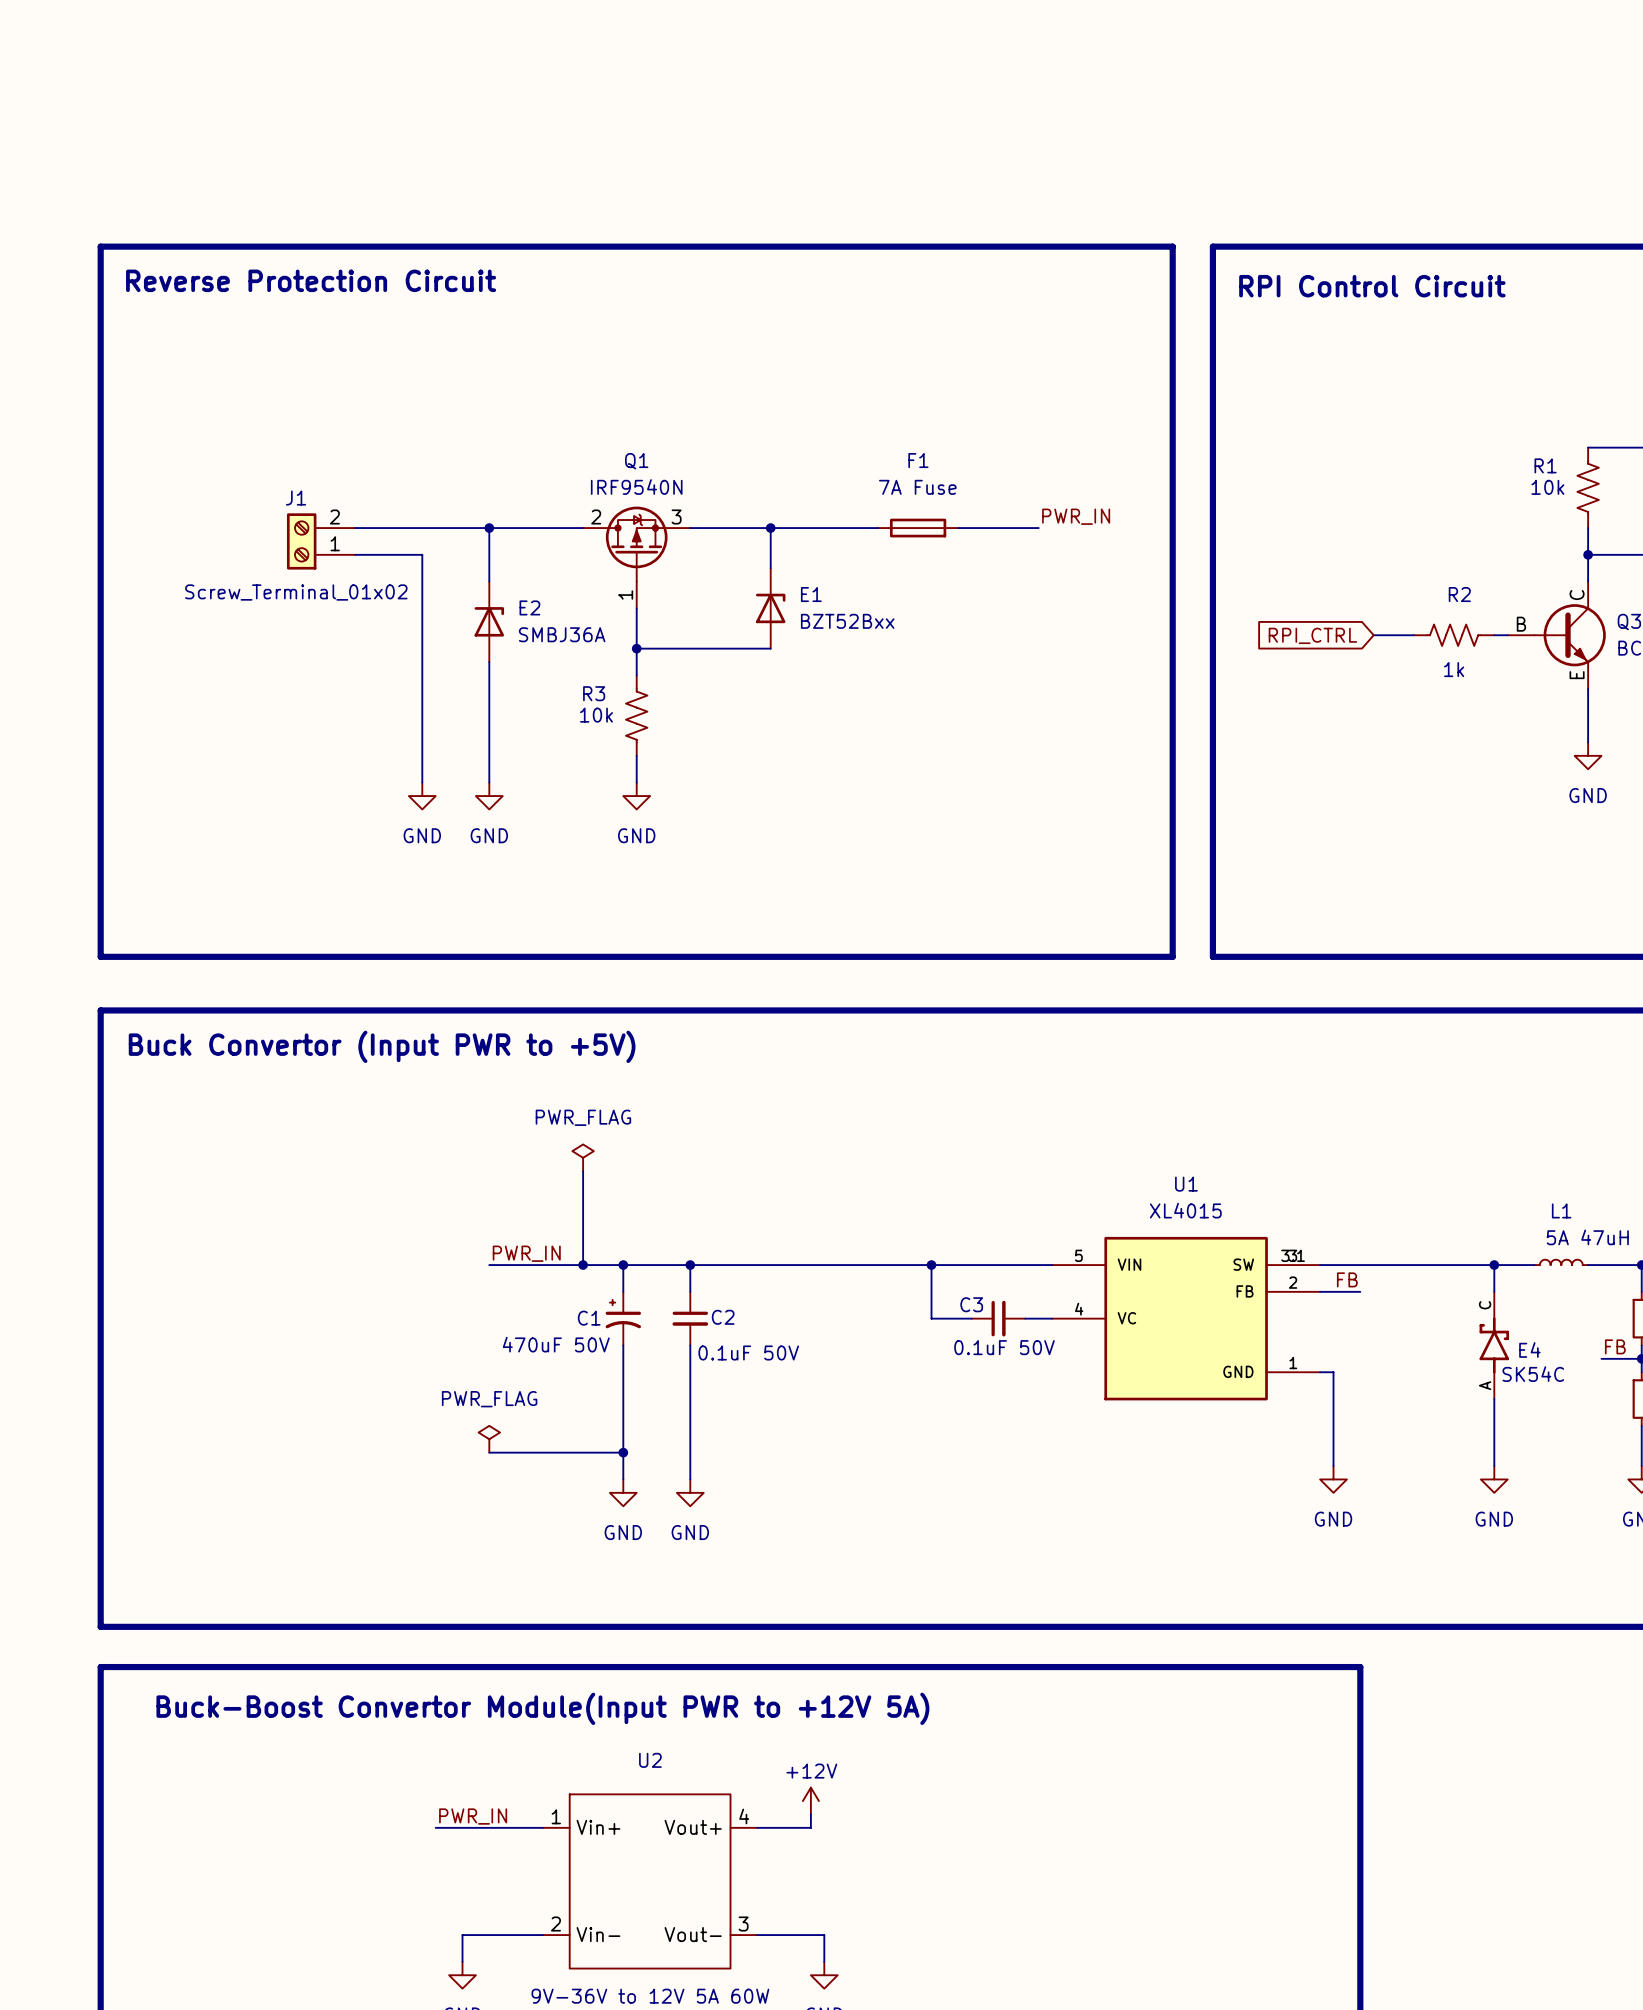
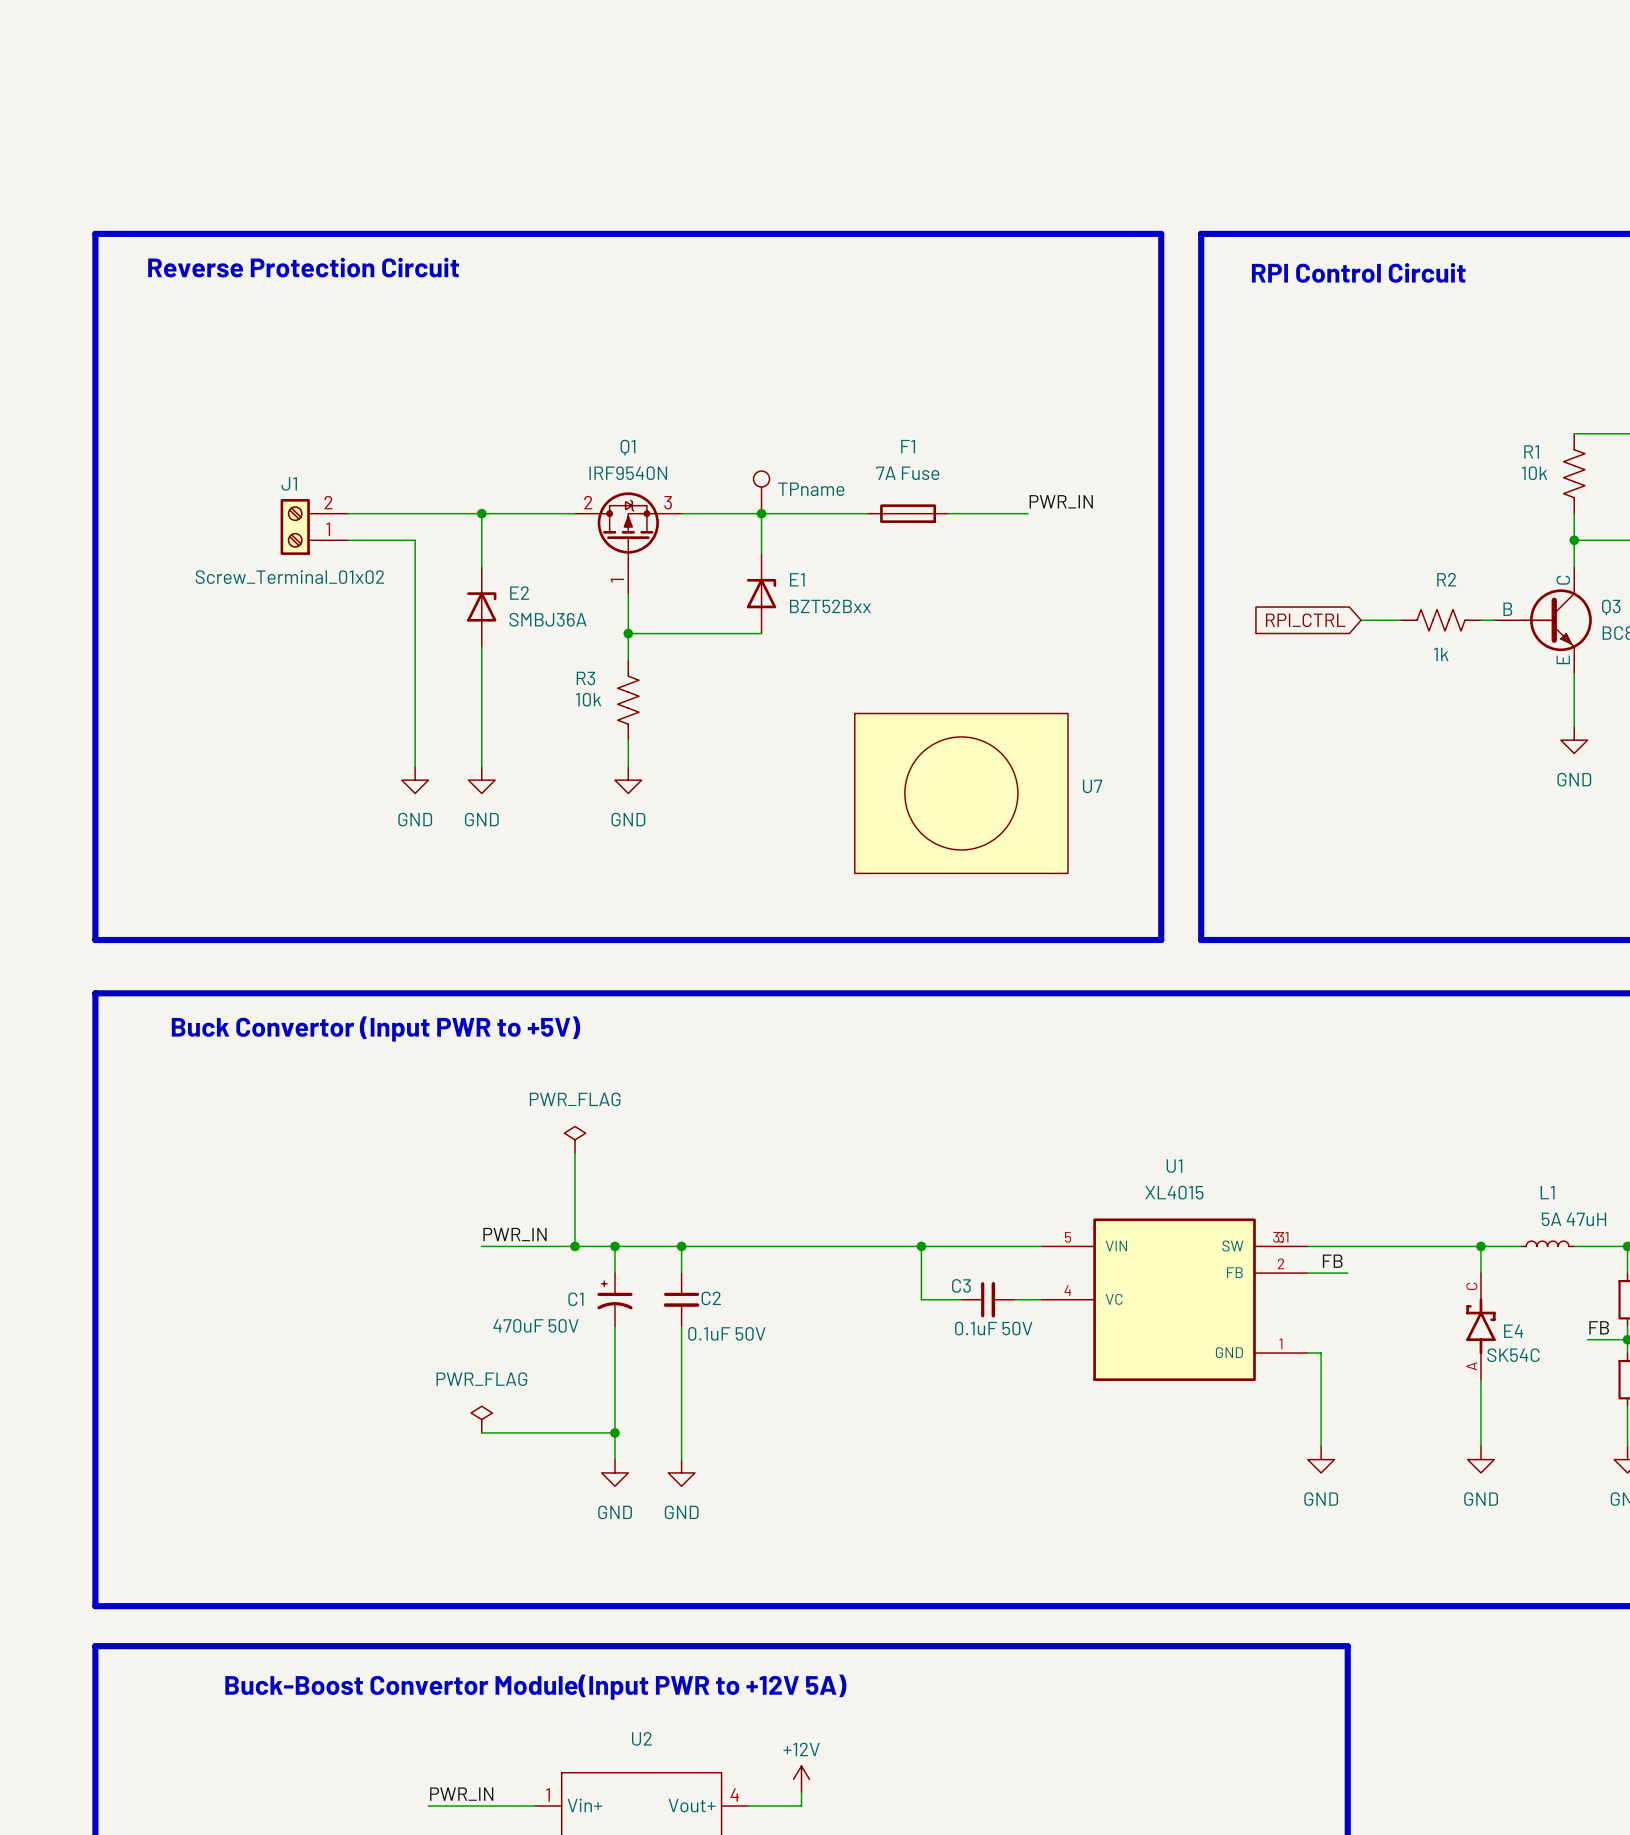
TPname: none -> (761, 492)
U7: none -> (961, 793)

